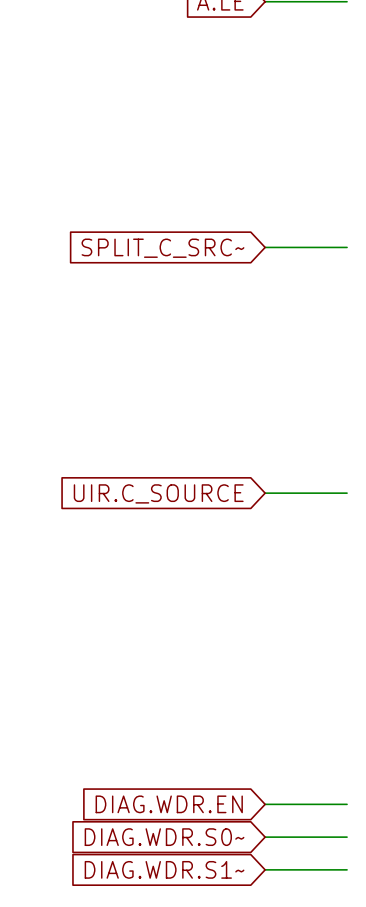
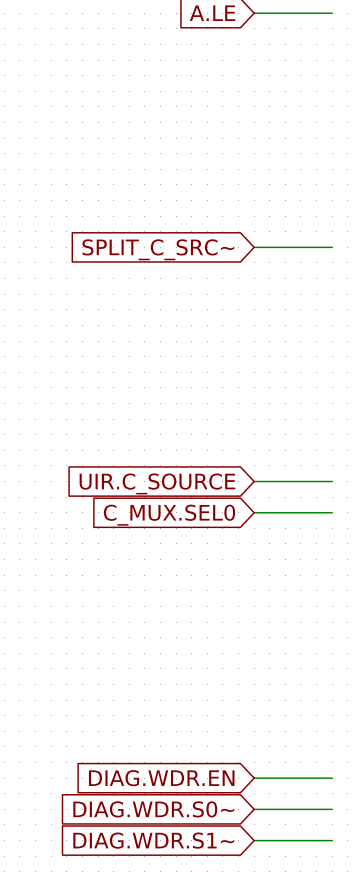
wire: none -> (254, 512) (332, 512)
global label: none -> C_MUX.SEL0 (169, 515)

